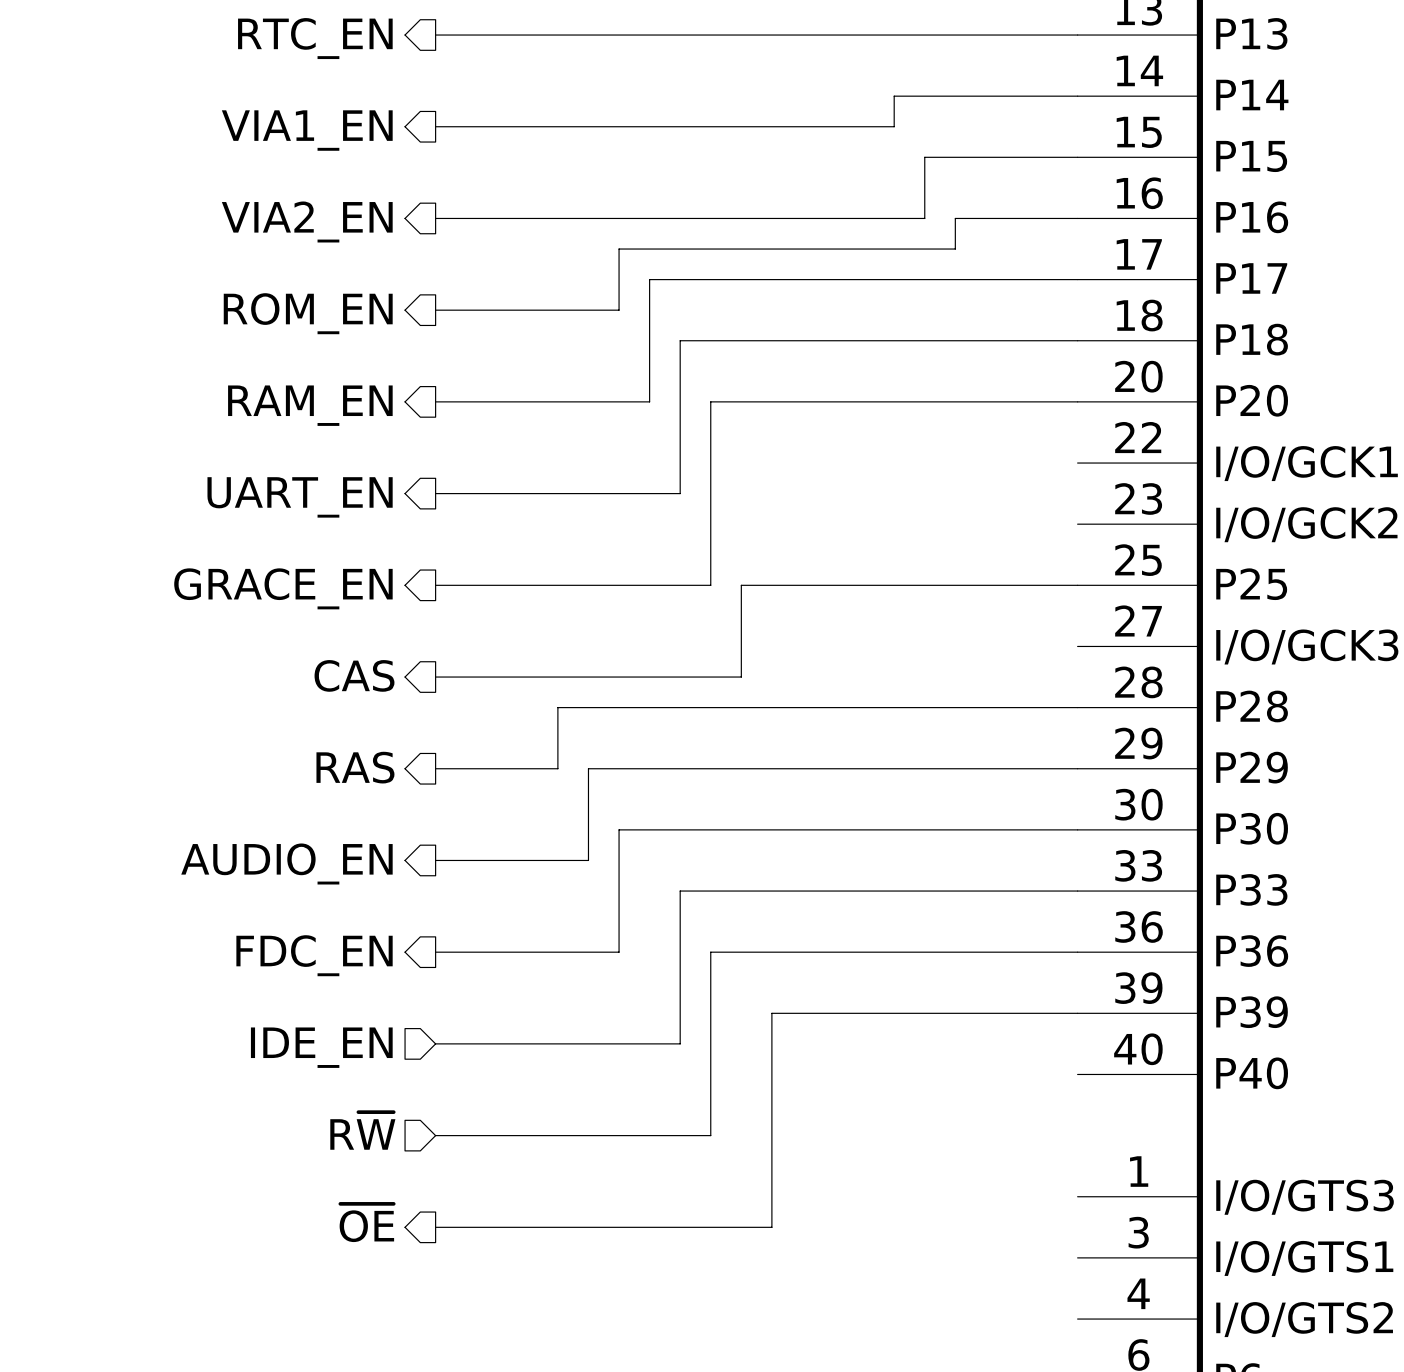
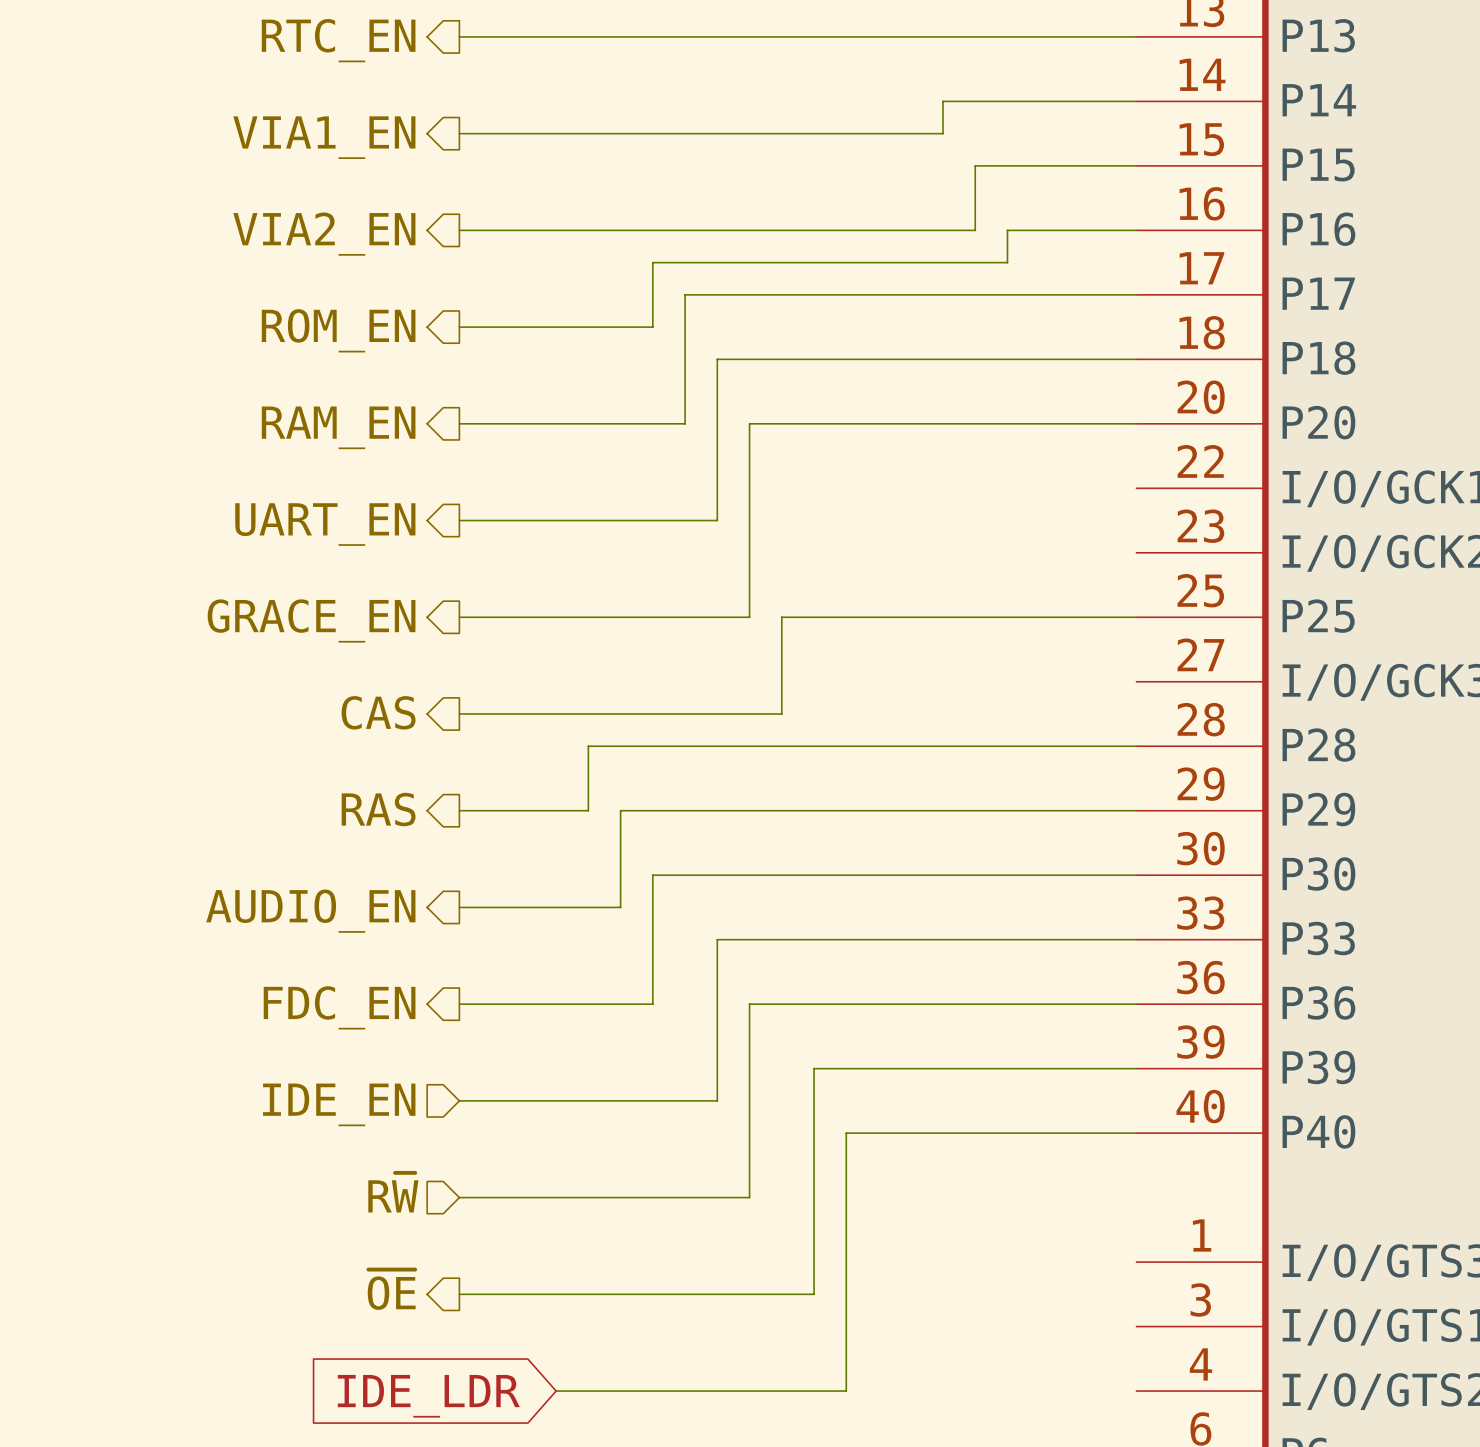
wire: none -> (1136, 1133) (846, 1133) (846, 1391) (556, 1391)
global label: none -> IDE_LDR (428, 1396)

